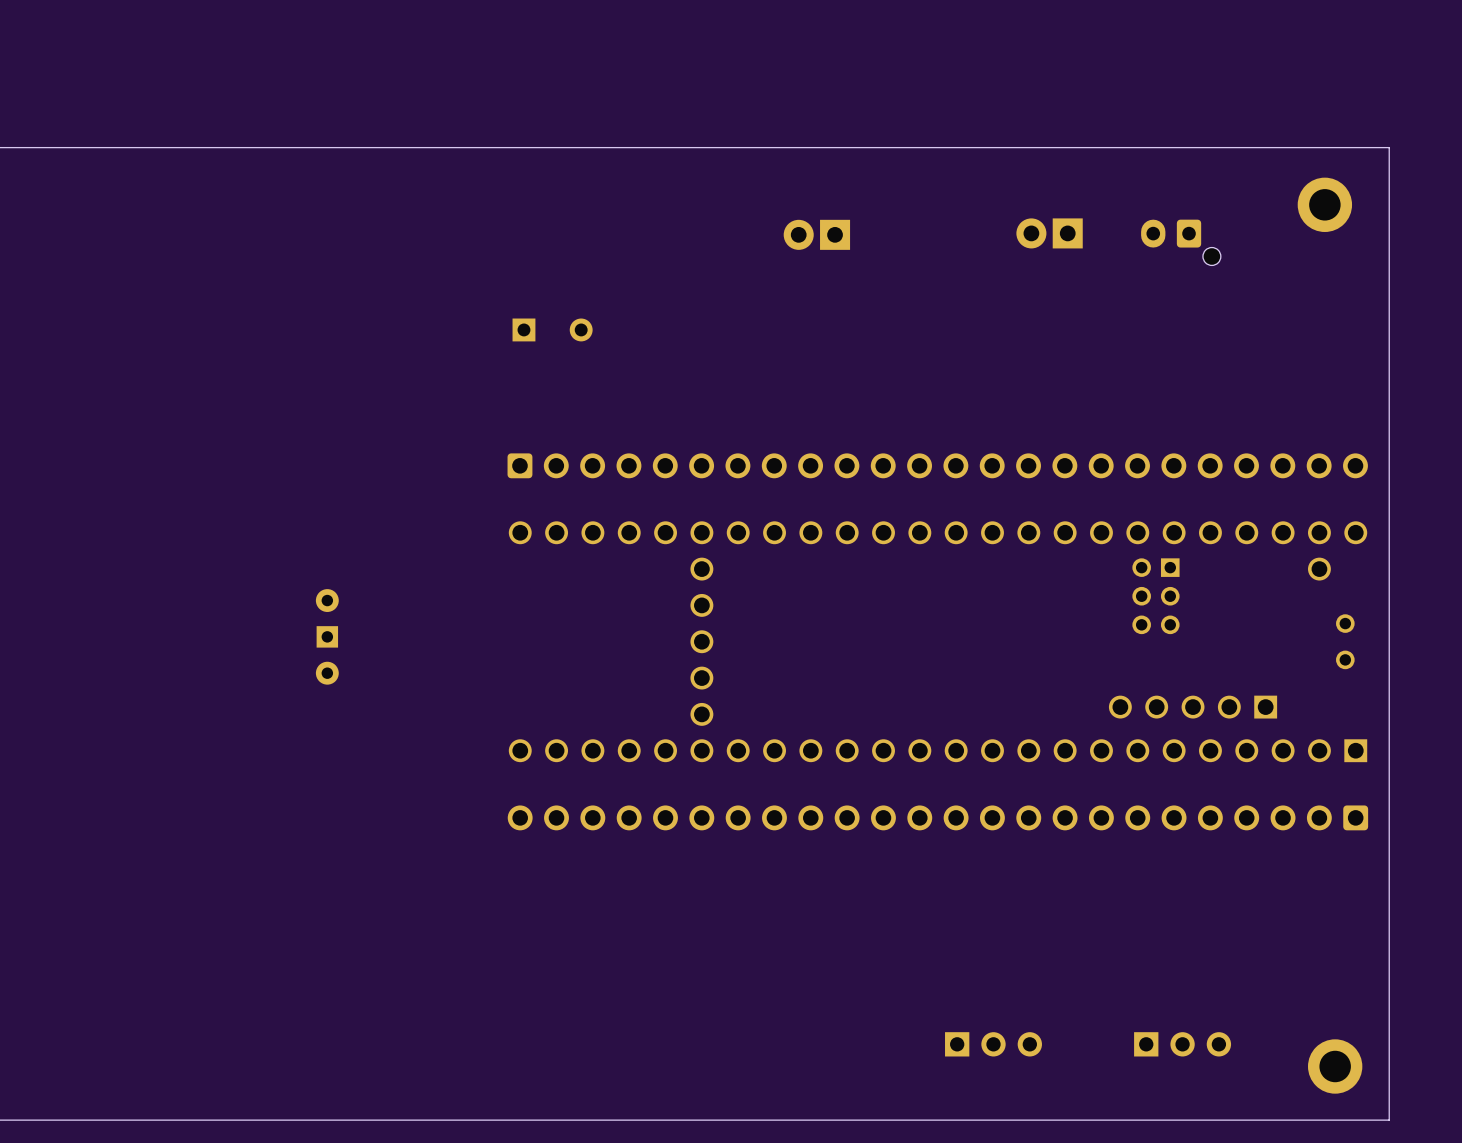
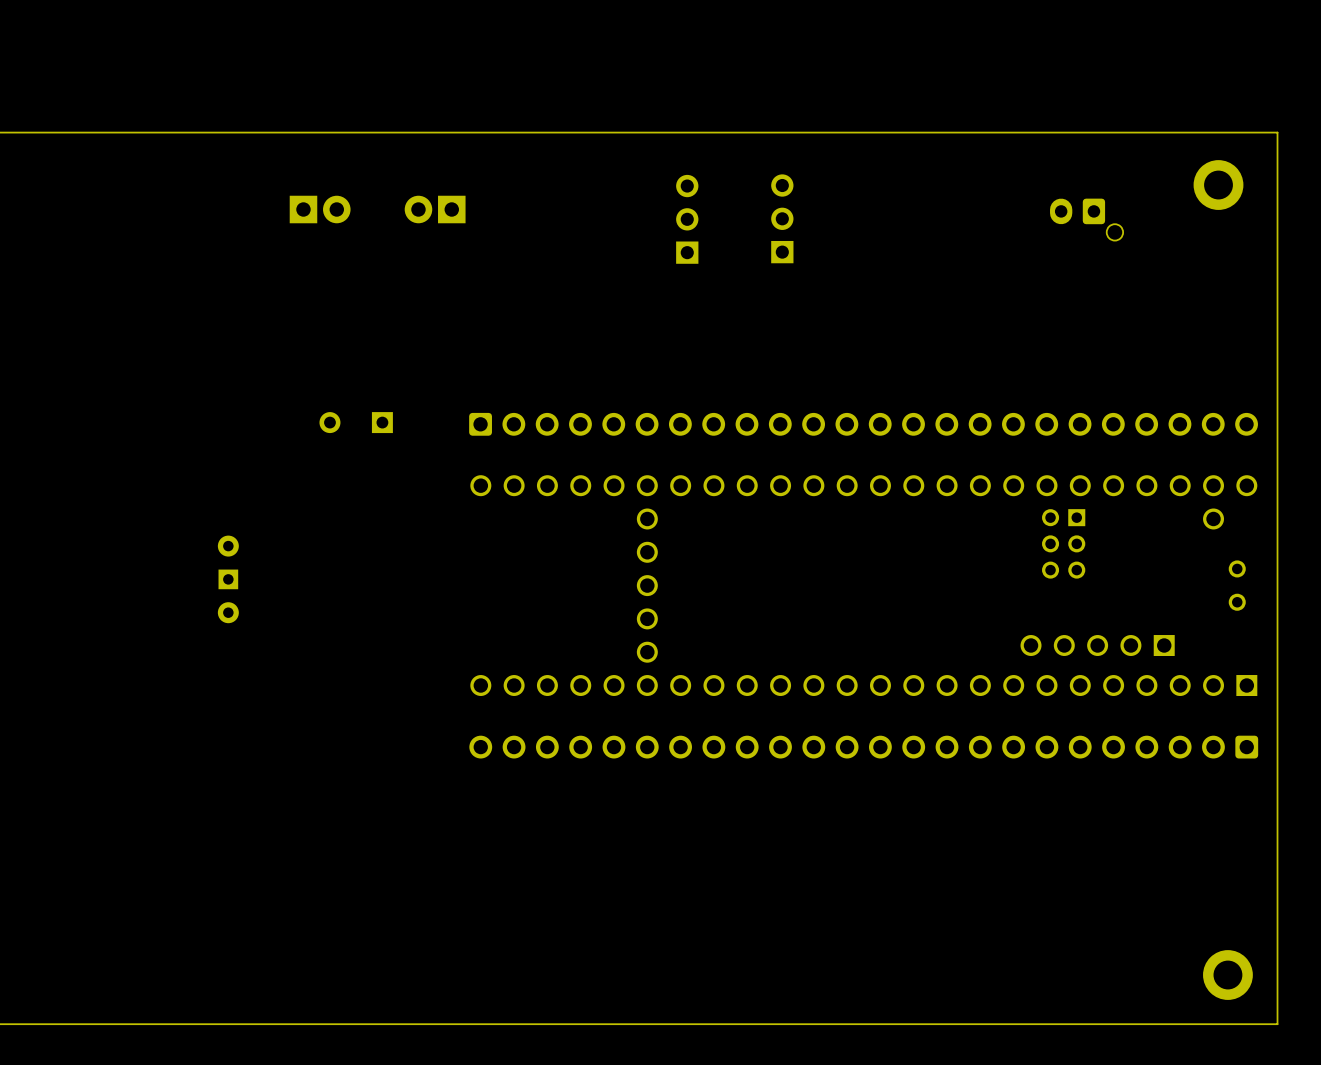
part: none -> (320, 209)
part: none -> (435, 209)
part: (1049, 233) -> none
part: (816, 234) -> none
part: none -> (782, 218)
part: none -> (687, 219)
part rotation: 0° (552, 329) -> 180° (356, 422)
part position: (552, 329) -> (356, 422)
part position: (327, 636) -> (228, 579)
part: (993, 1044) -> none
part: (1182, 1044) -> none

